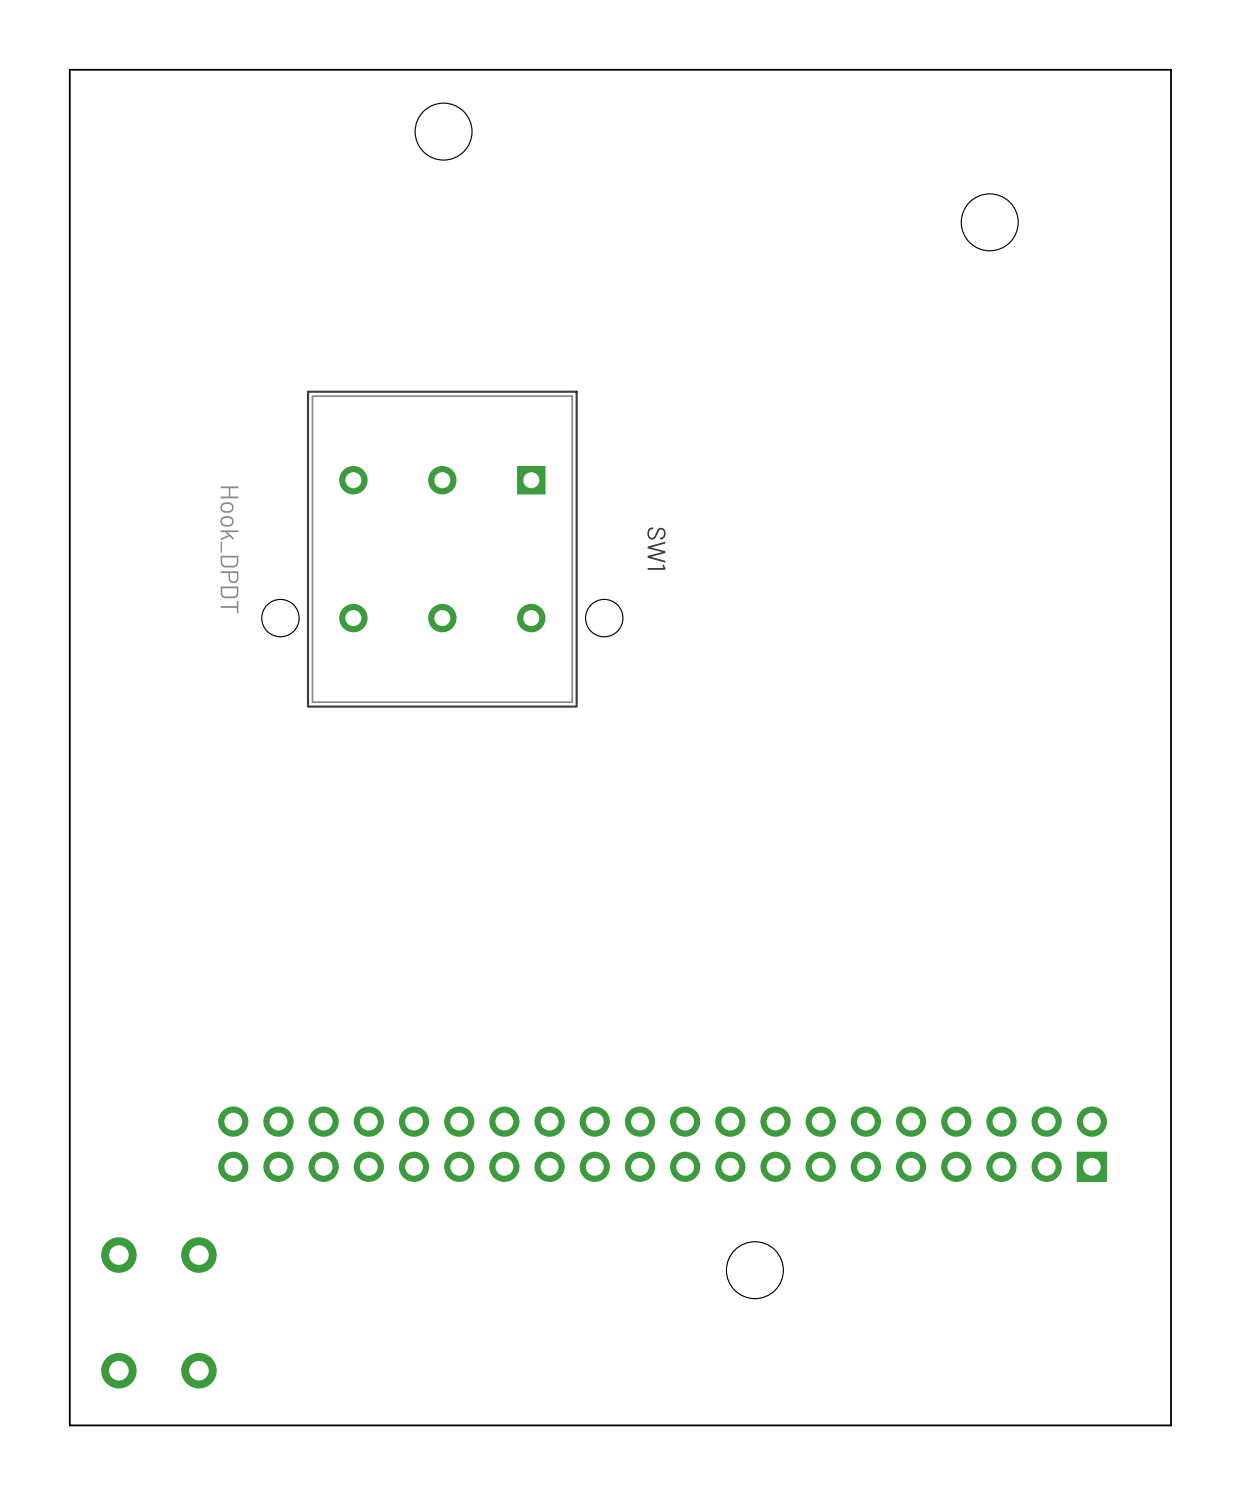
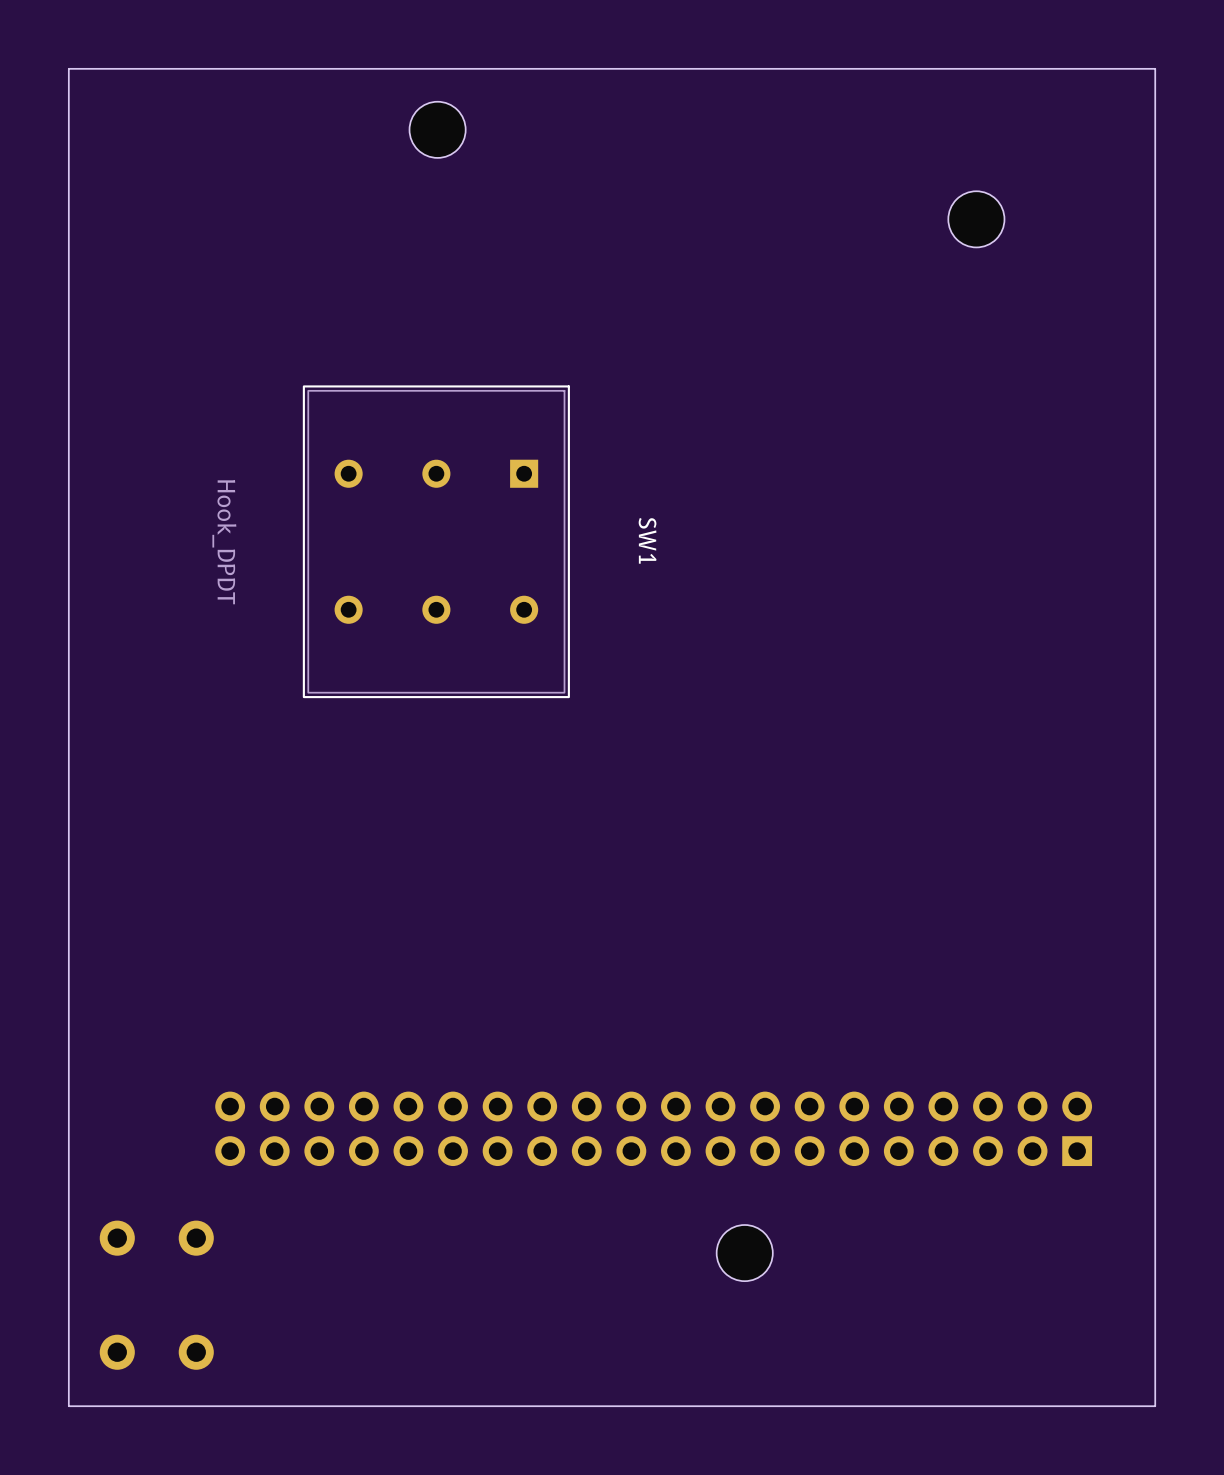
SW1 footprint: [261, 390, 623, 708] -> [302, 385, 570, 699]

